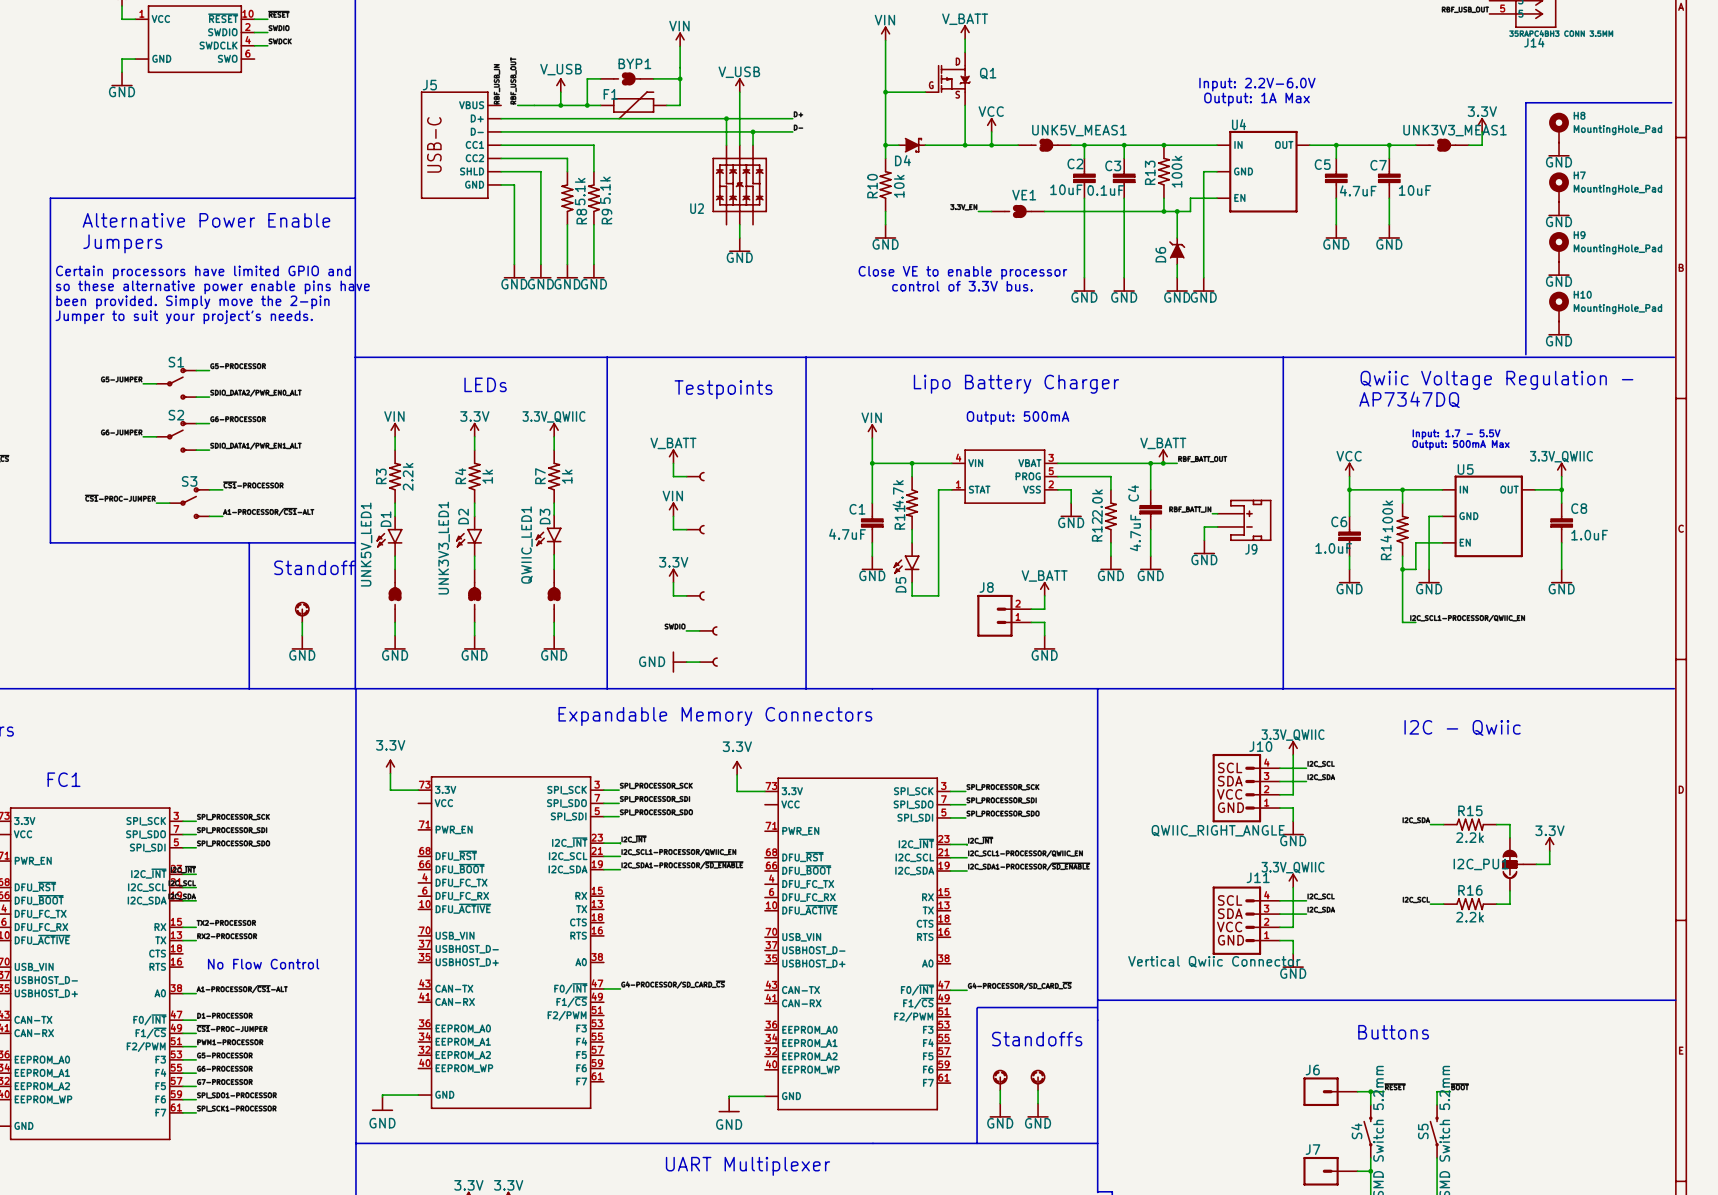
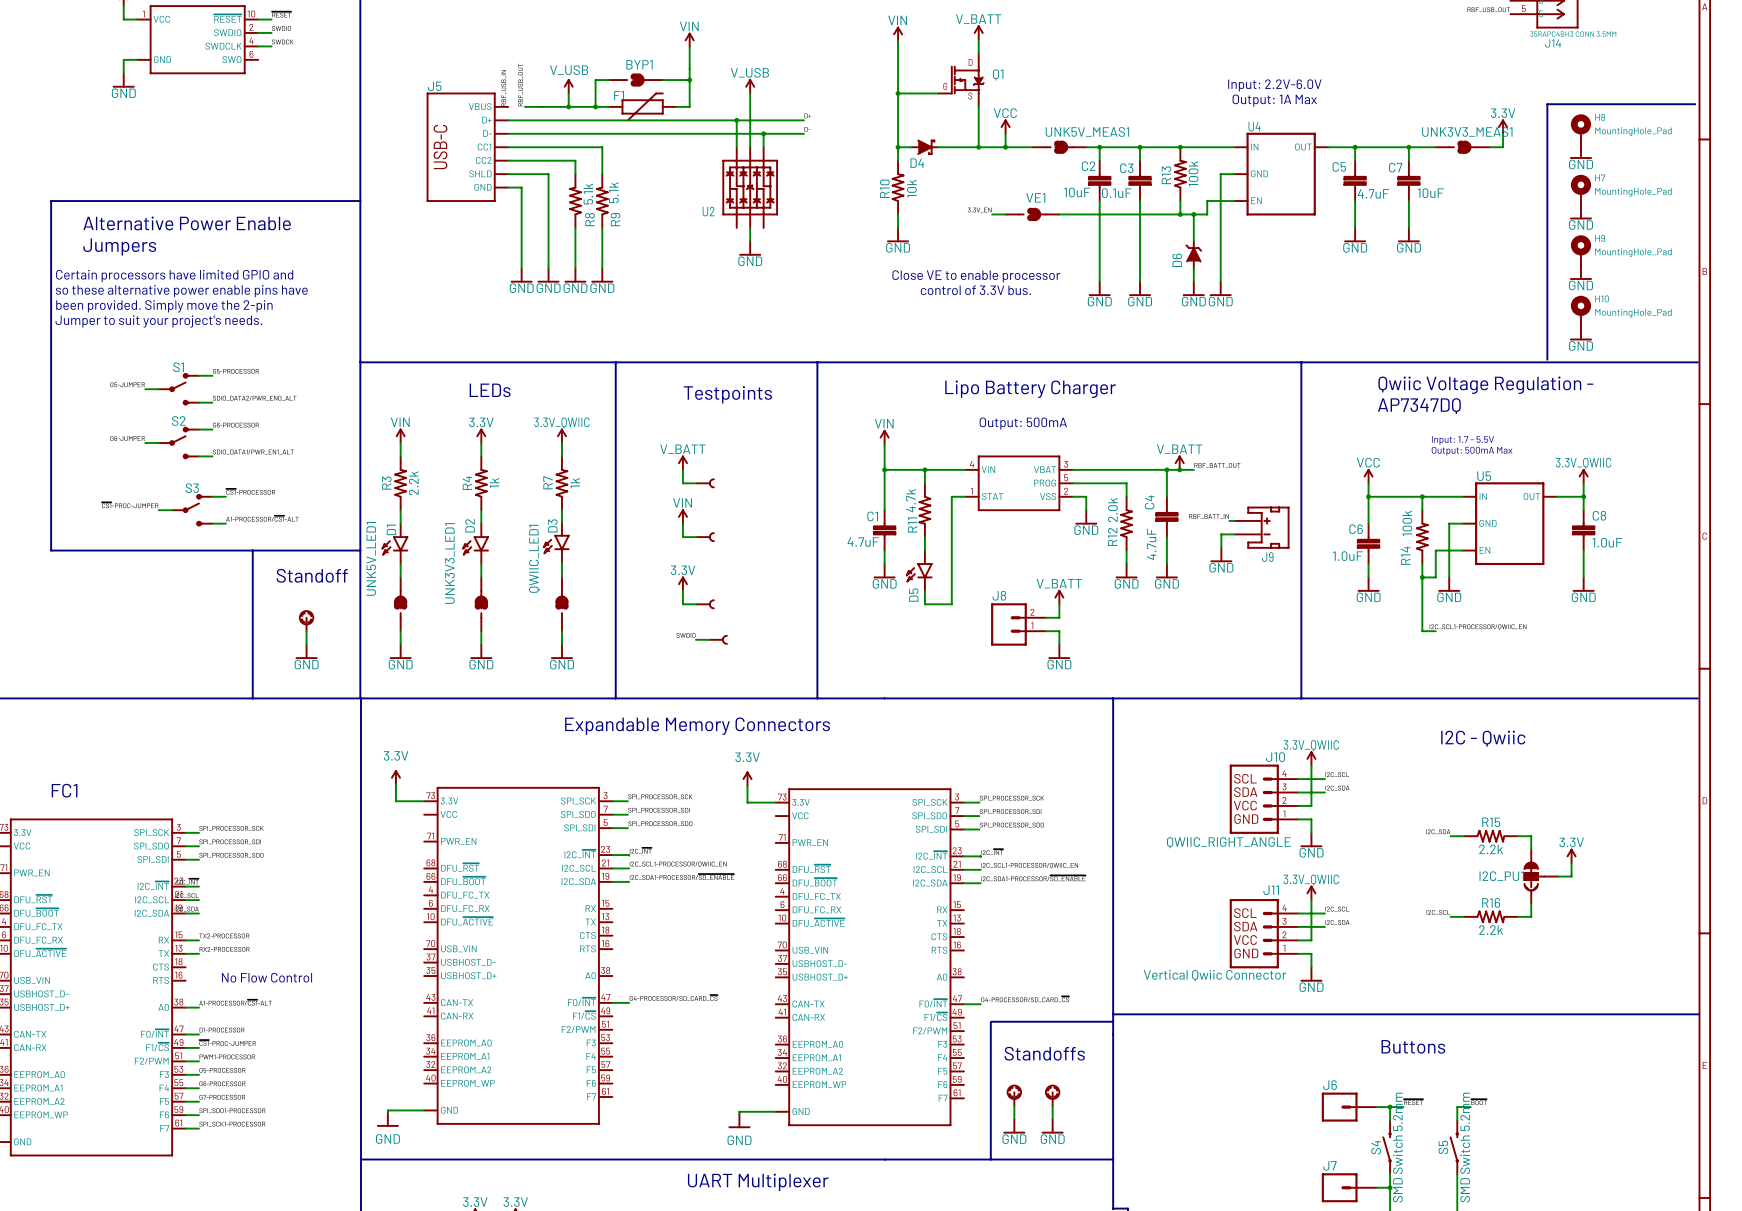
power symbol: GND (679, 662) -> none
wire: (686, 662) (699, 662) -> none
part: (708, 662) -> none

